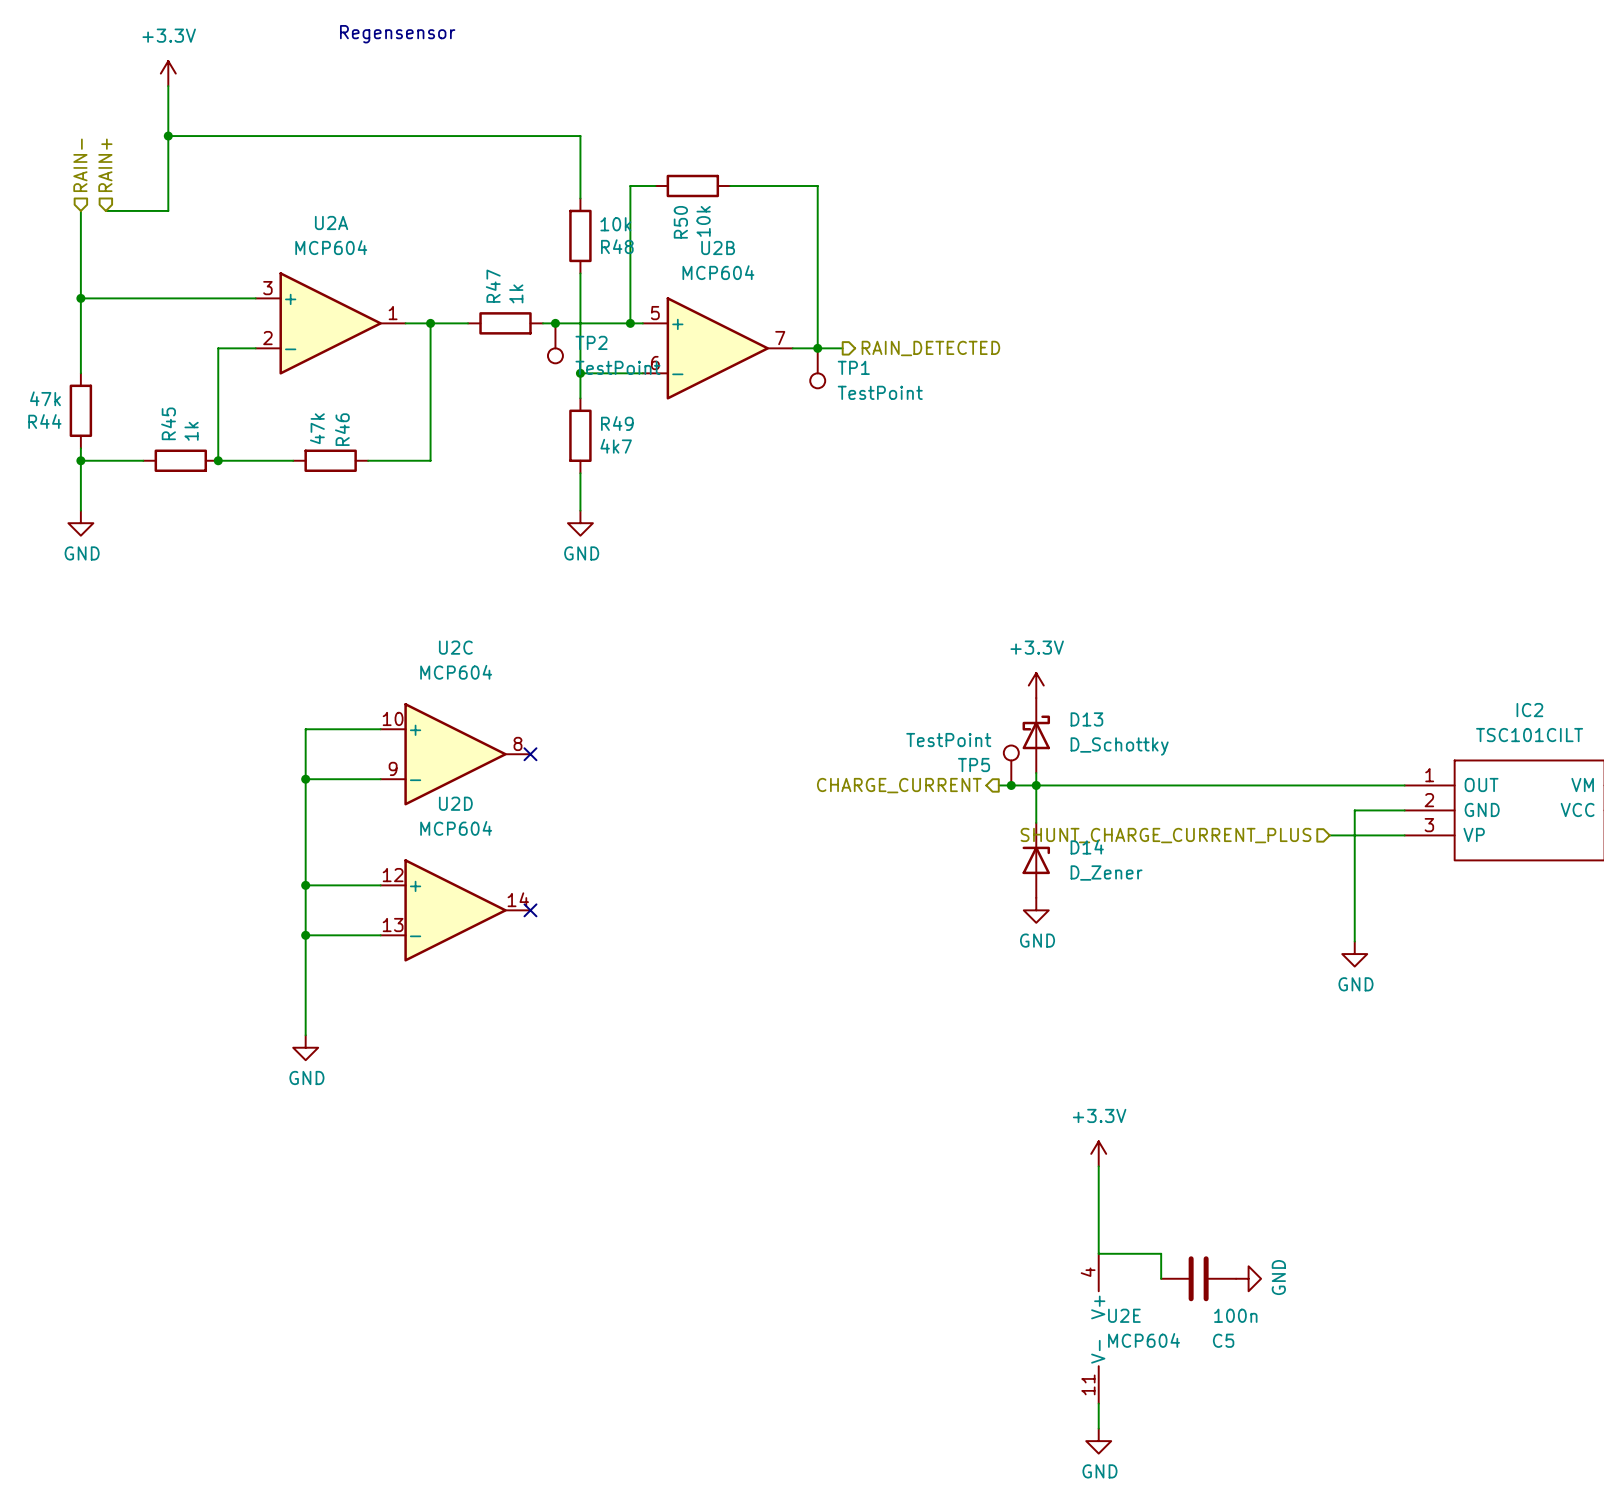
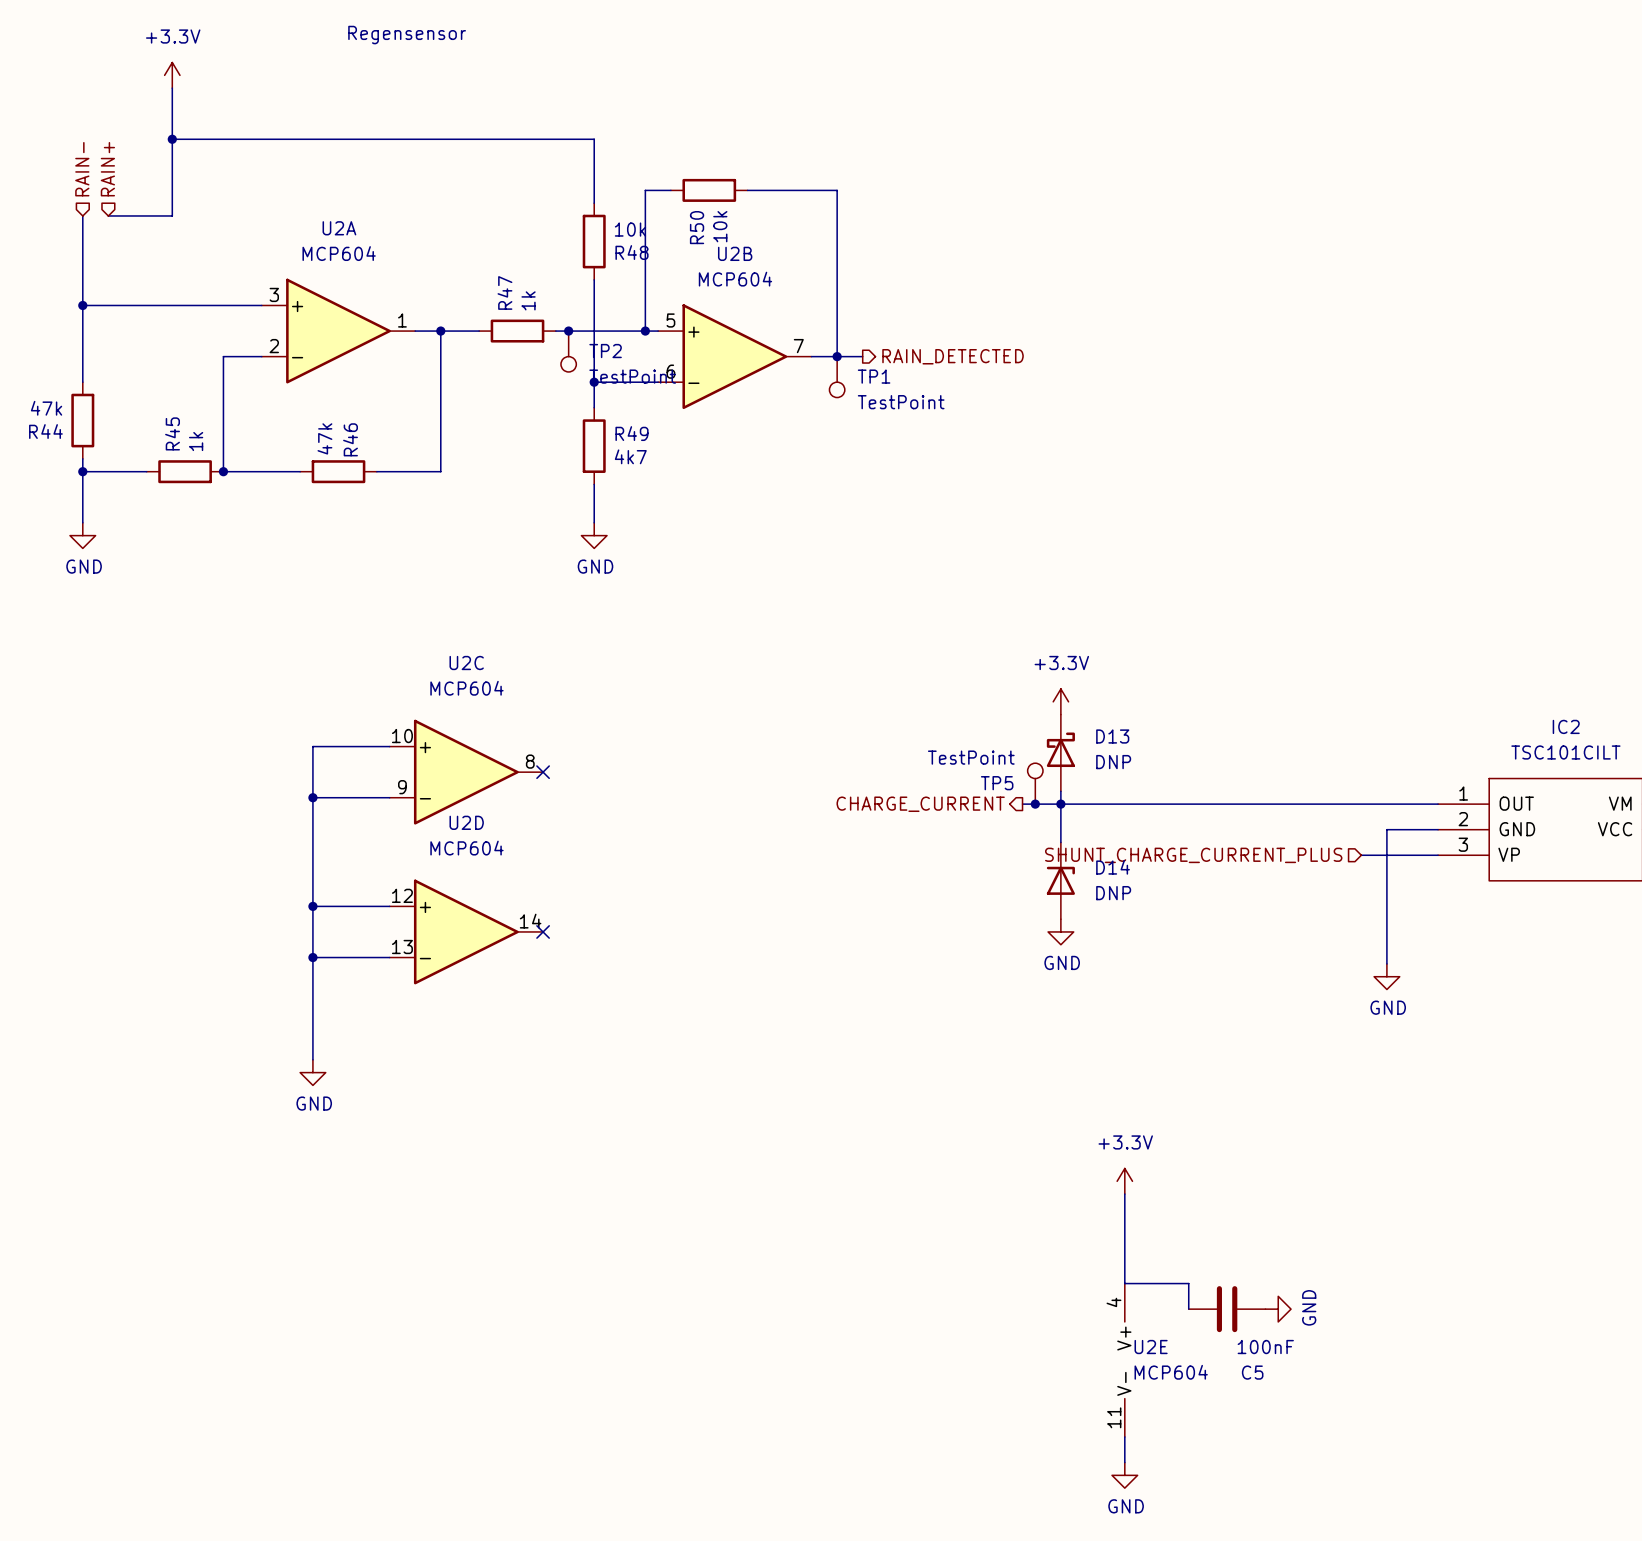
D13 value: D_Schottky (1119, 746) -> DNP (1113, 762)
D14 value: D_Zener (1106, 873) -> DNP (1113, 893)
C5 value: 100n (1235, 1315) -> 100nF (1265, 1347)

